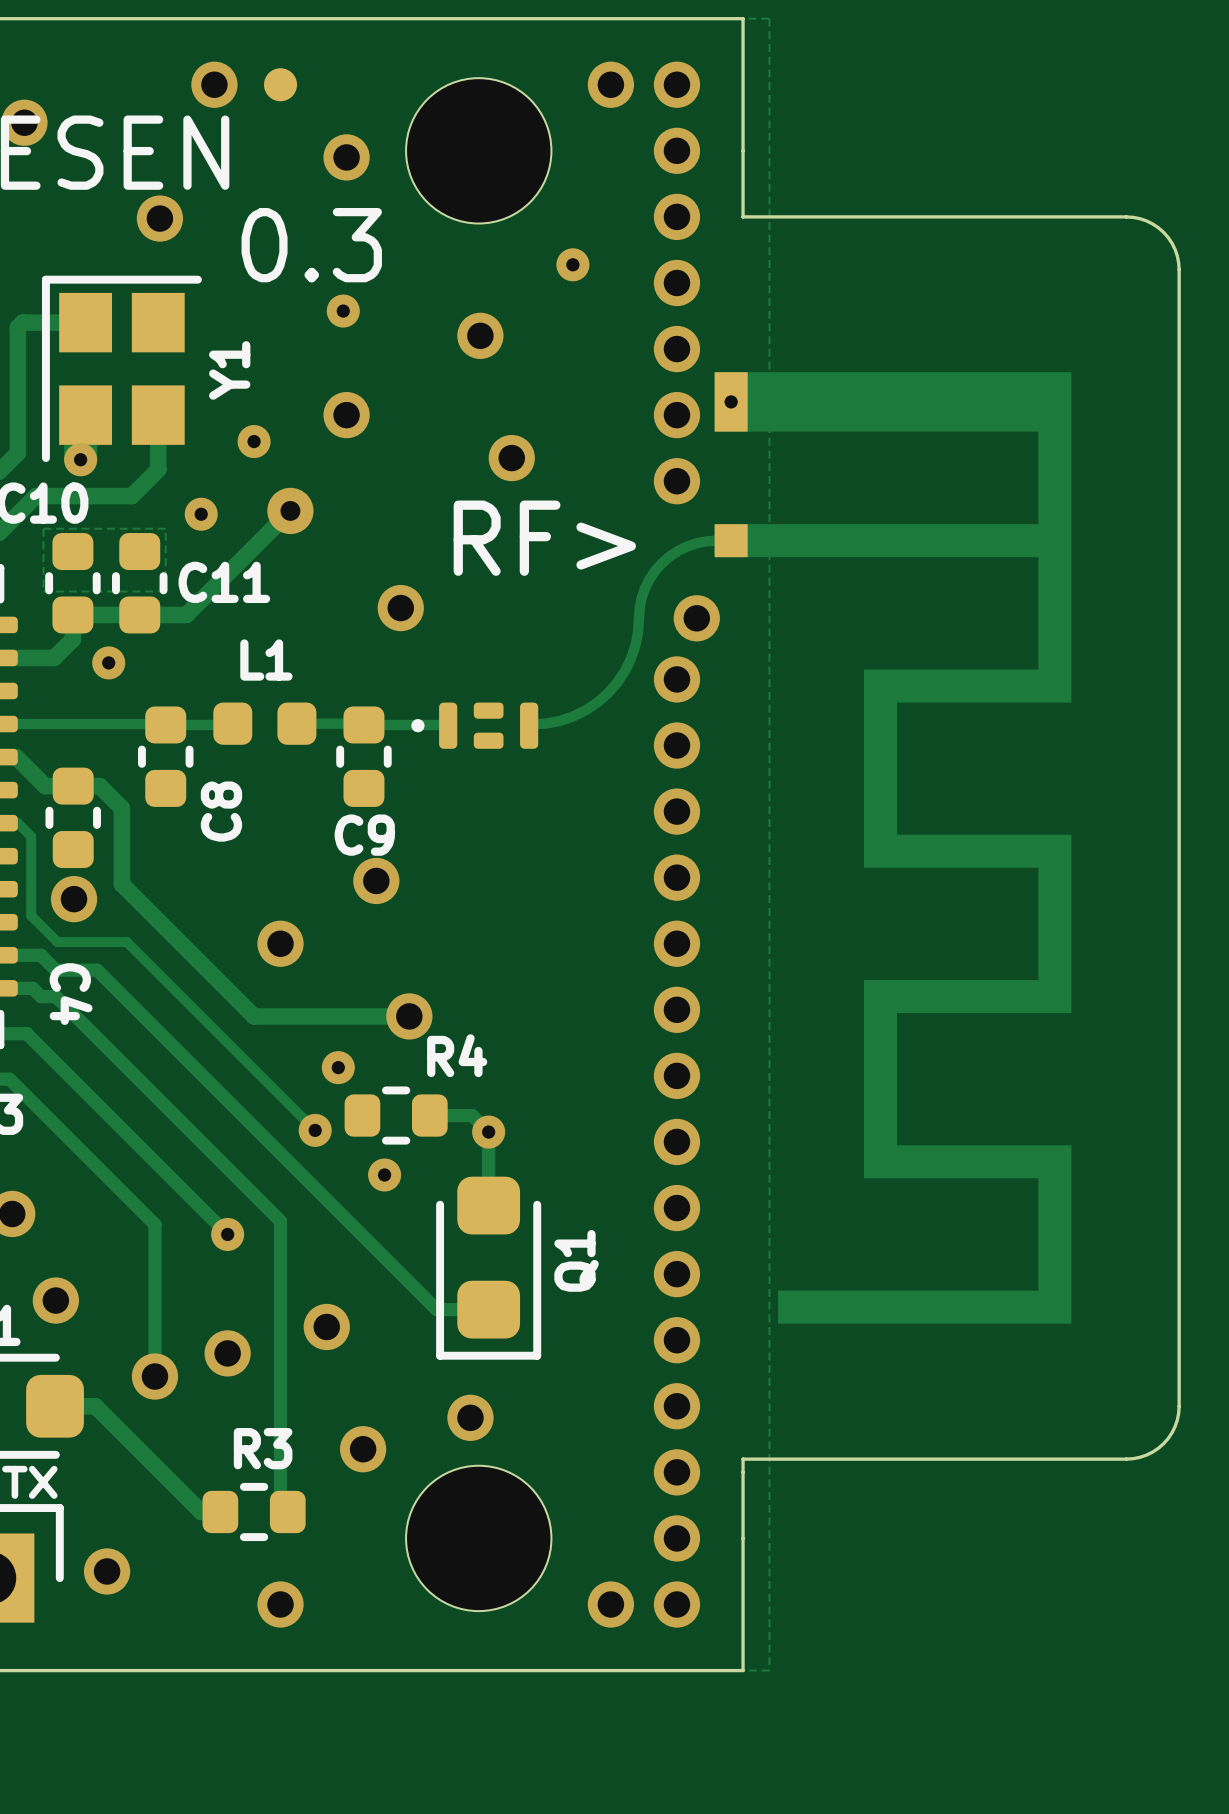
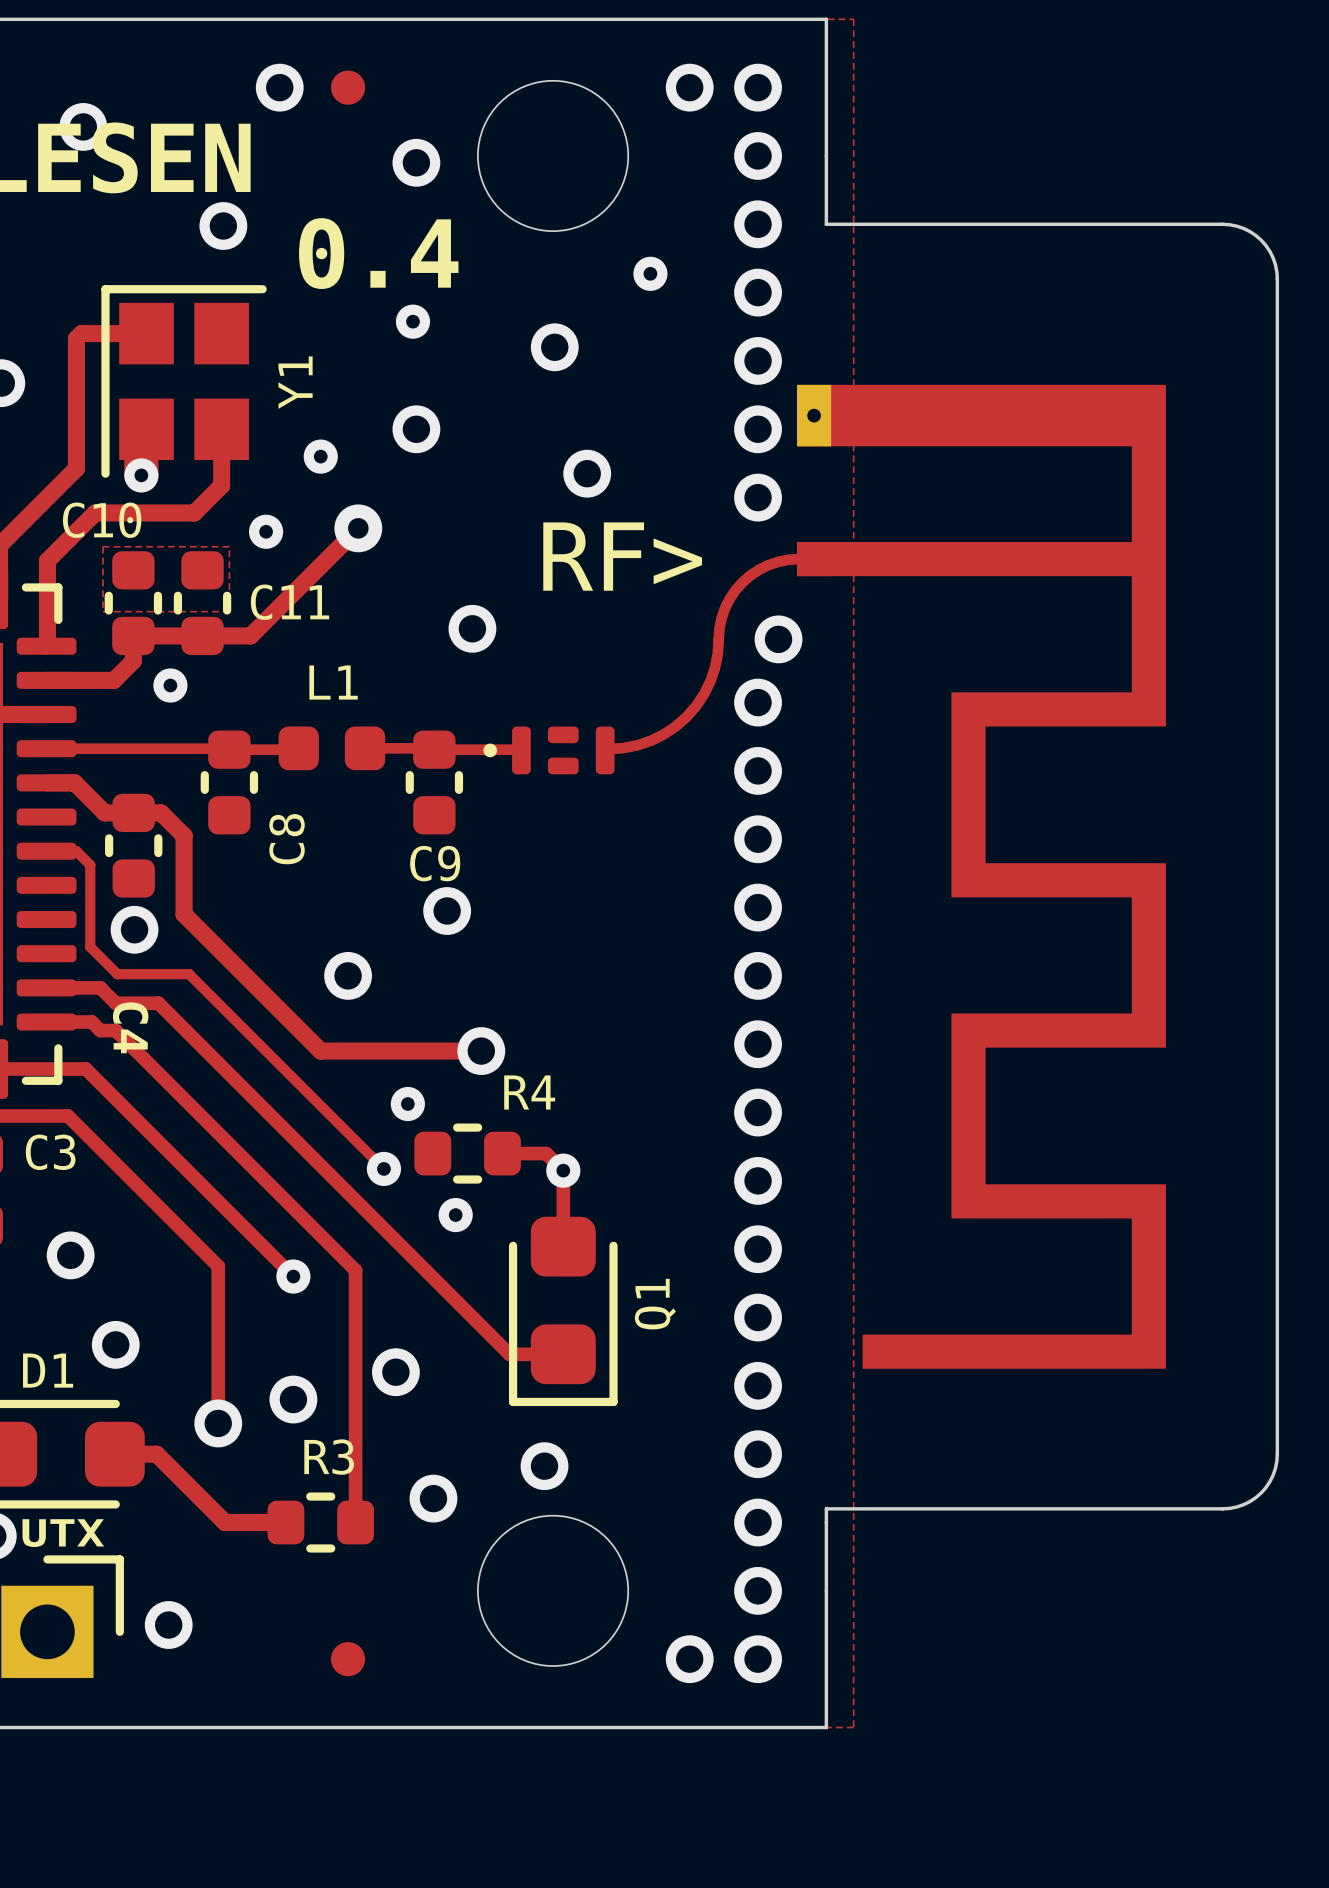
text: 0.3 (311, 245) -> 0.4 (378, 253)
track: (280, 1221) (280, 1504) (287, 1511) -> (348, 1262) (355, 1270) (355, 1522)
track: (161, 1472) (201, 1511) (220, 1511) -> (225, 1522) (285, 1522)
R3 position: (254, 1511) -> (320, 1522)
part: none -> (348, 1659)
via: (280, 1604) -> none

